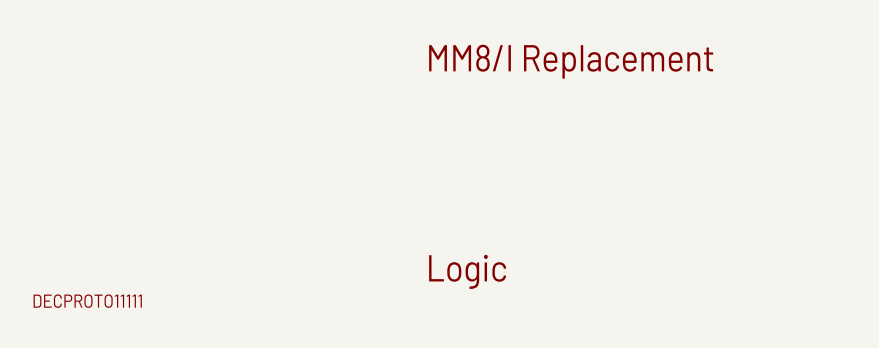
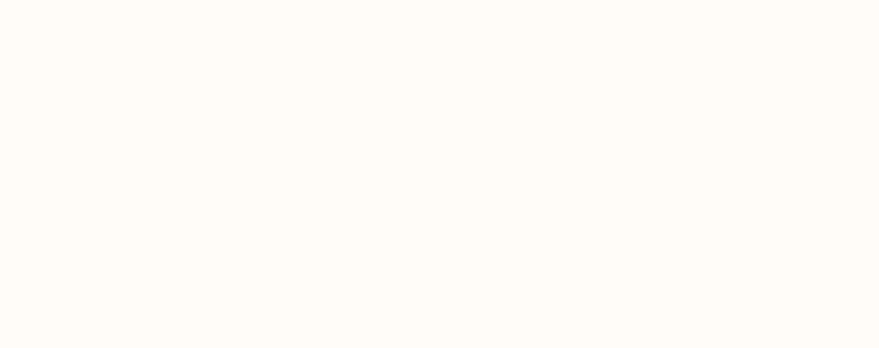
text: MM8/I Replacement (571, 61) -> none
text: Logic (467, 271) -> none
part: DECPROTO11111 (87, 301) -> none

